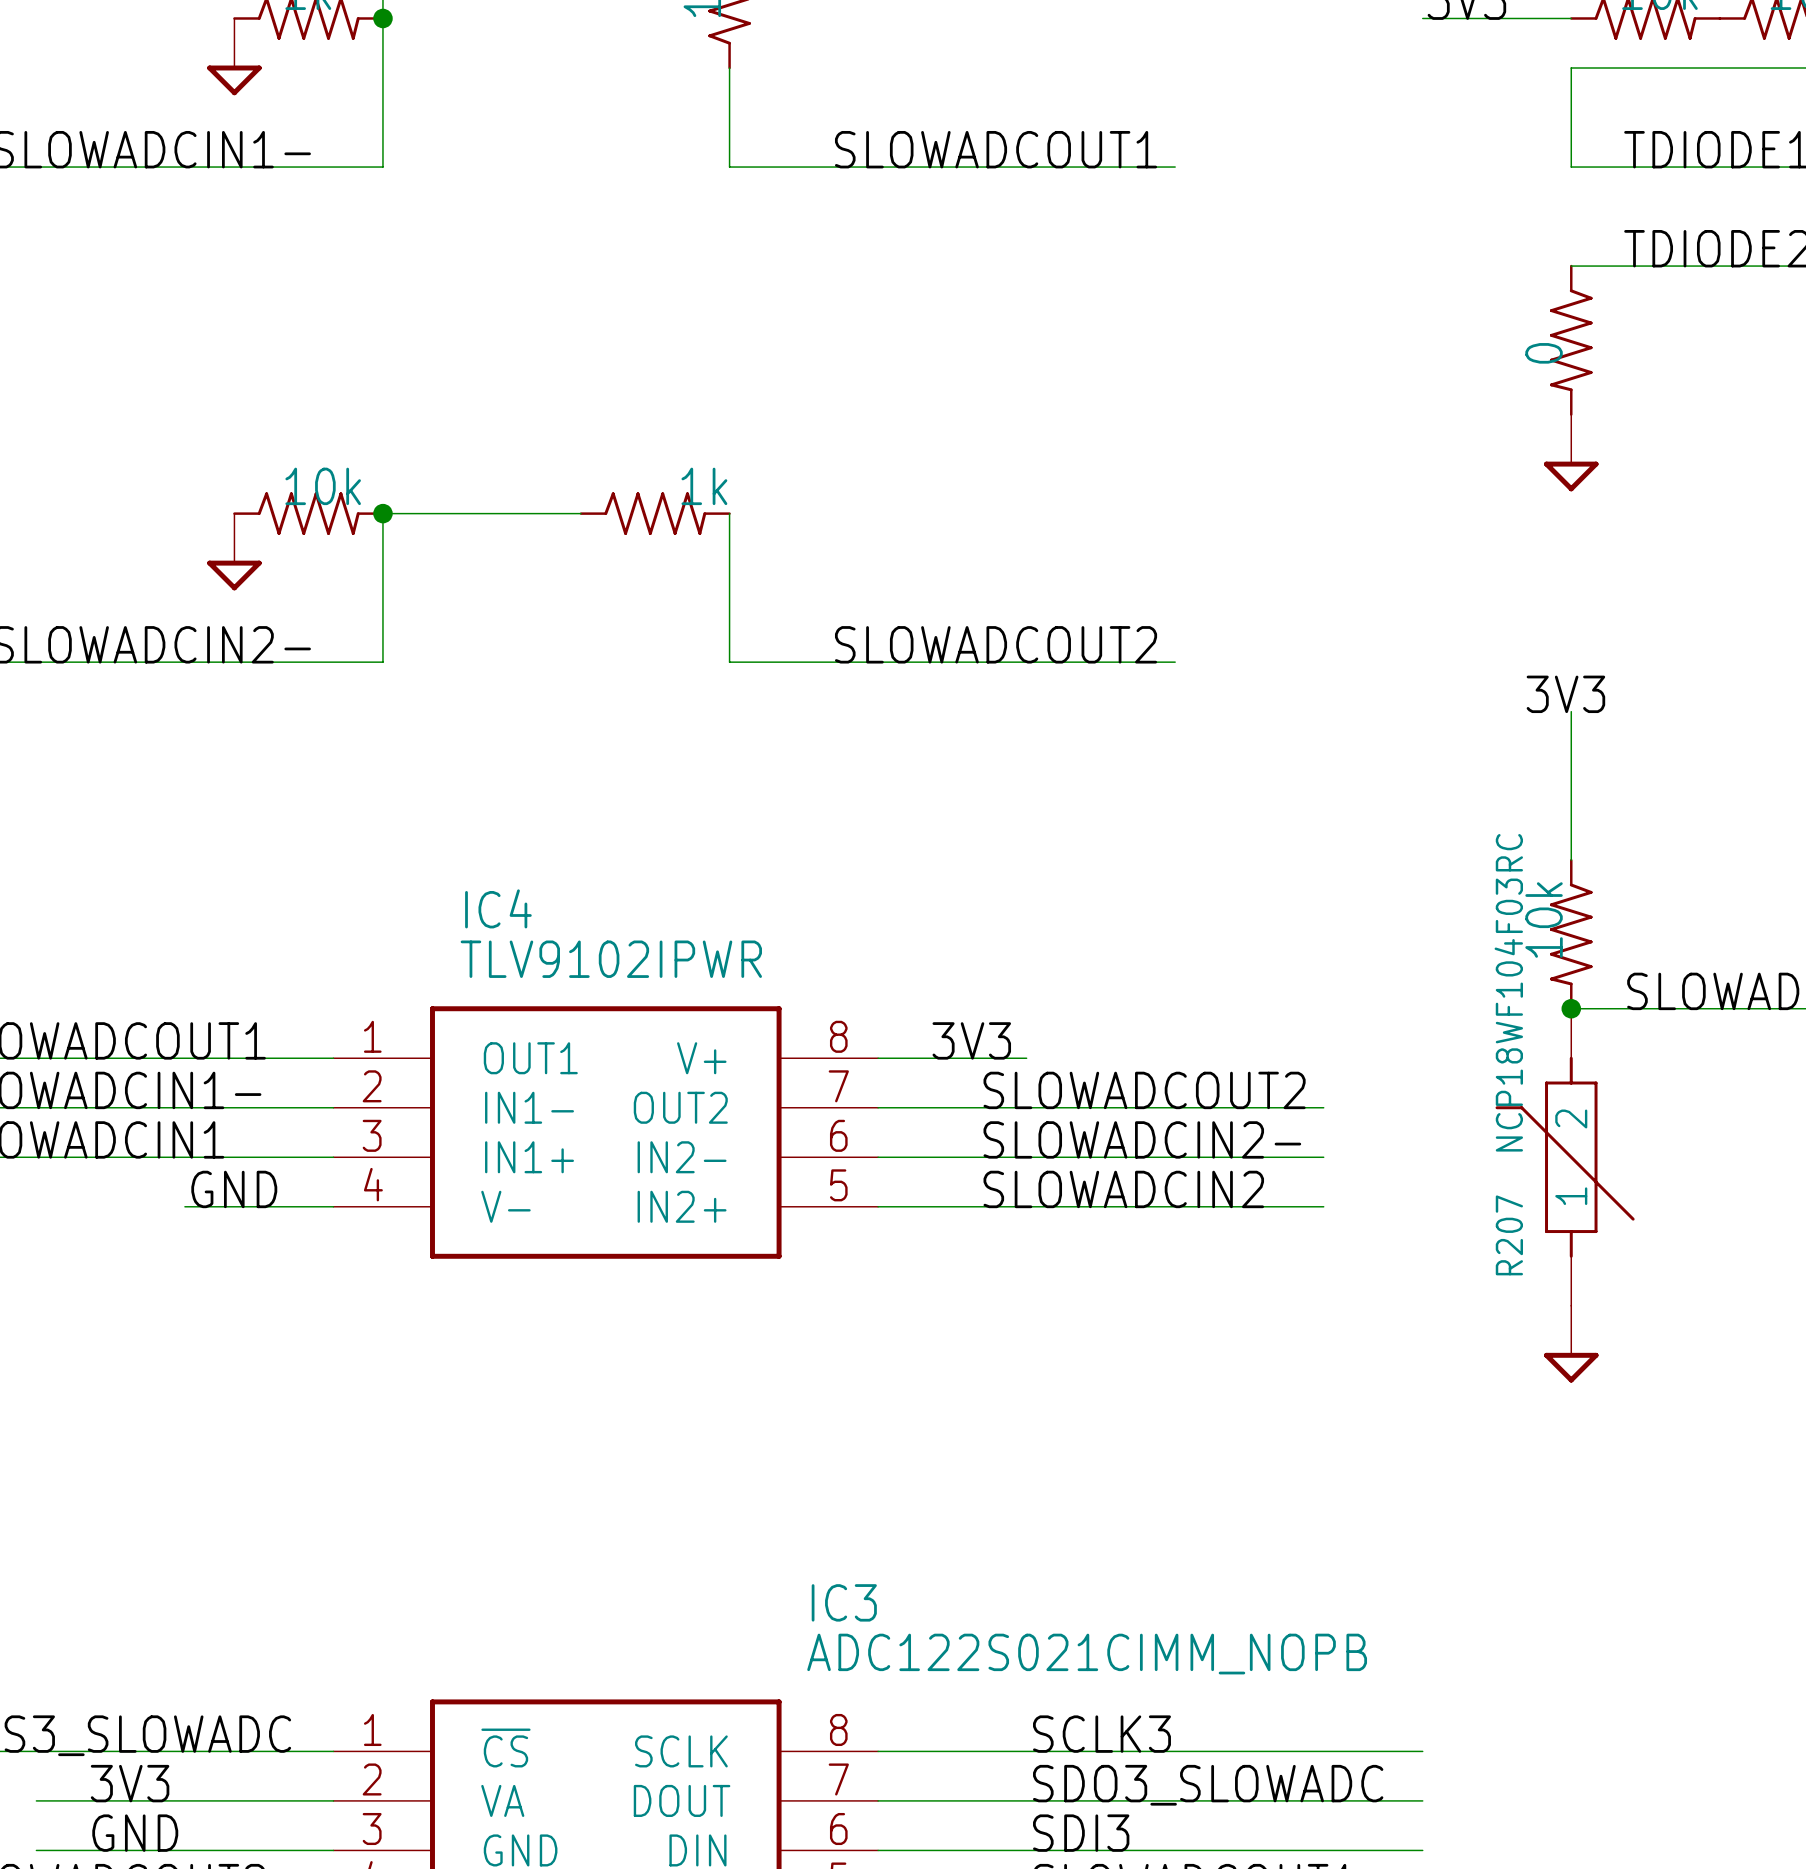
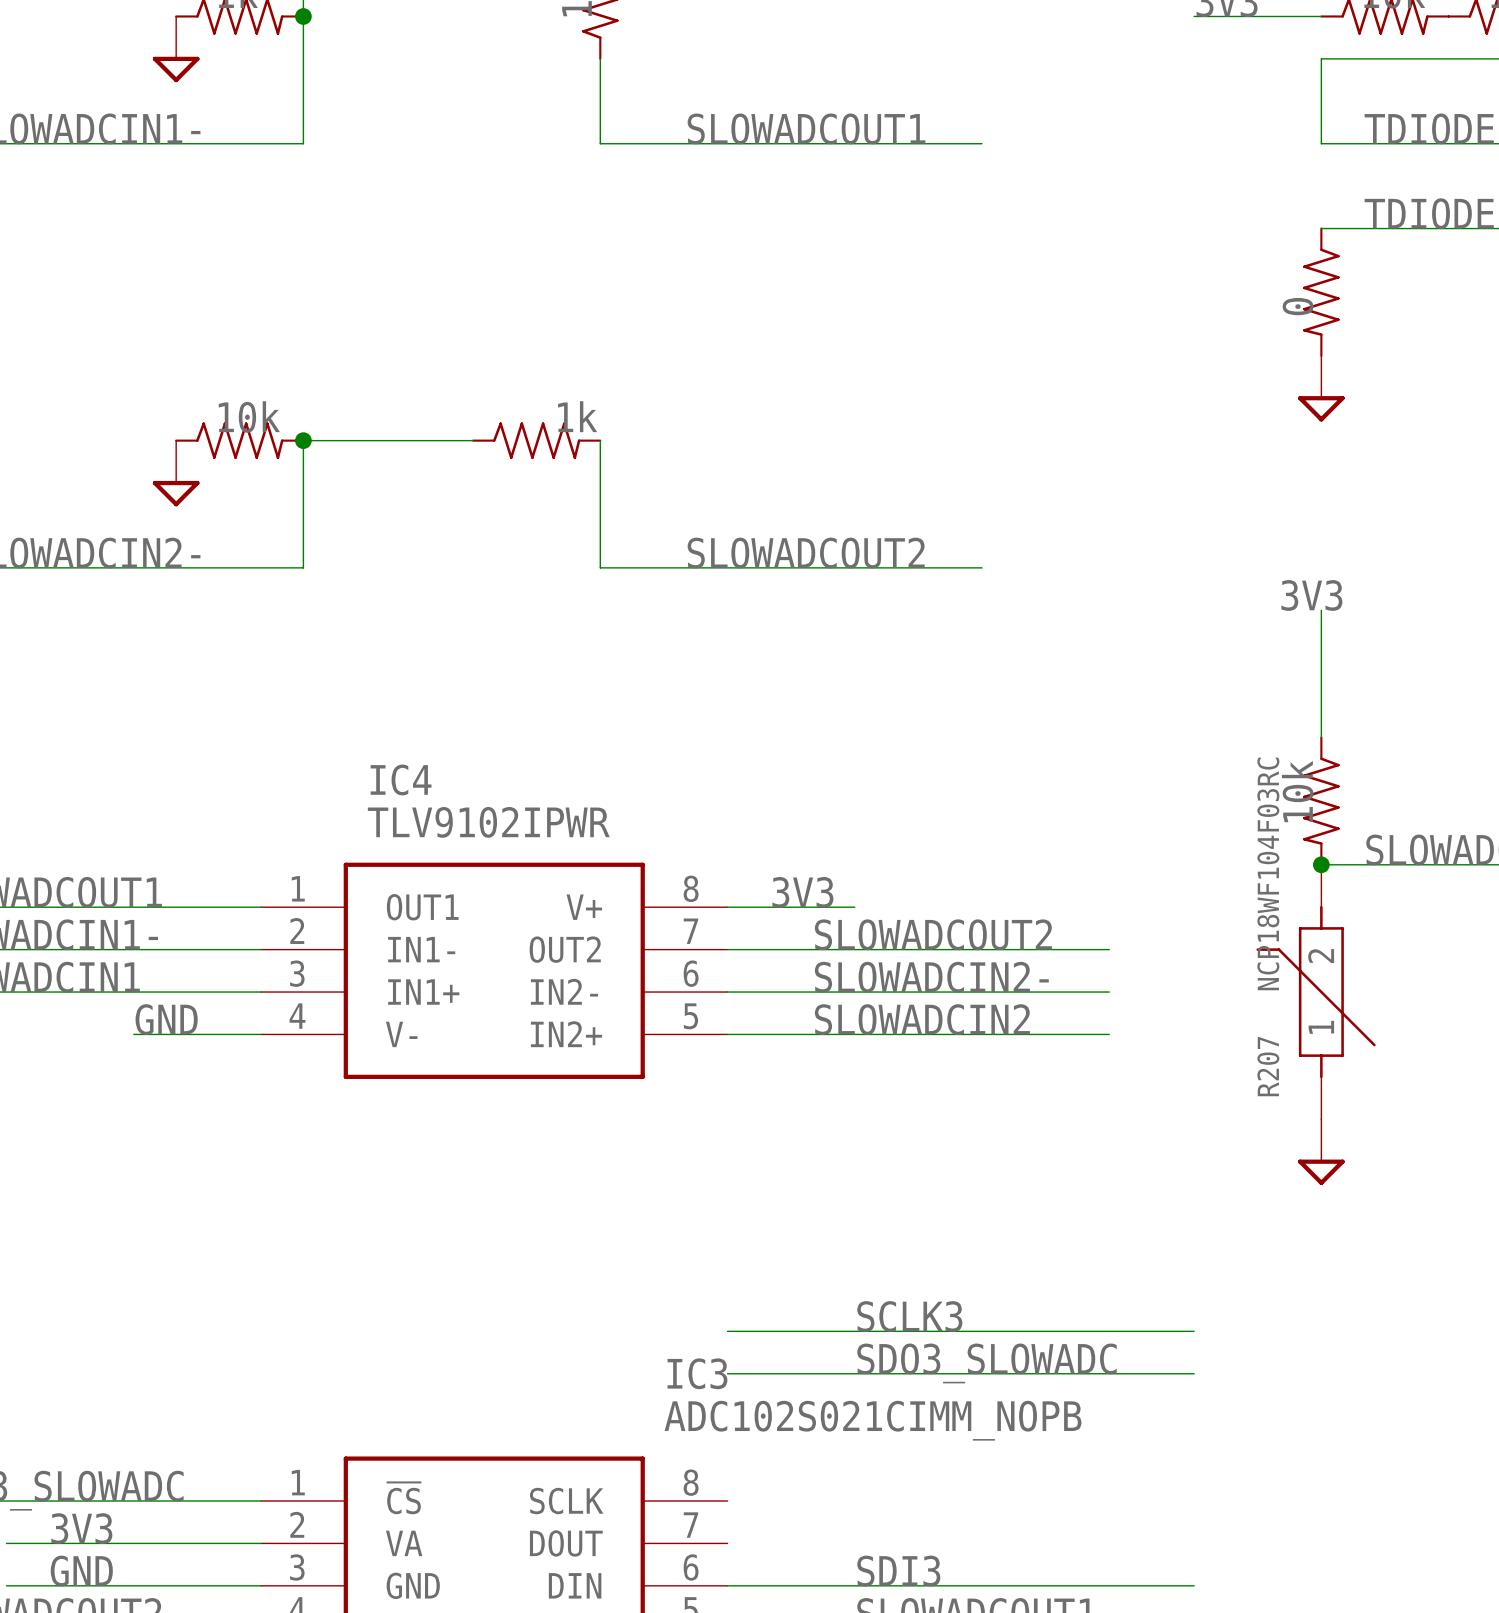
IC3 value: ADC122S021CIMM_NOPB (1087, 1654) -> ADC102S021CIMM_NOPB (873, 1420)
label position: SCLK3 (1101, 1734) -> SCLK3 (909, 1316)
wire: (878, 1751) (1422, 1751) -> (727, 1331) (1194, 1331)
label position: SDO3_SLOWADC (1208, 1785) -> SDO3_SLOWADC (987, 1363)
wire: (878, 1800) (1422, 1800) -> (727, 1373) (1194, 1373)

